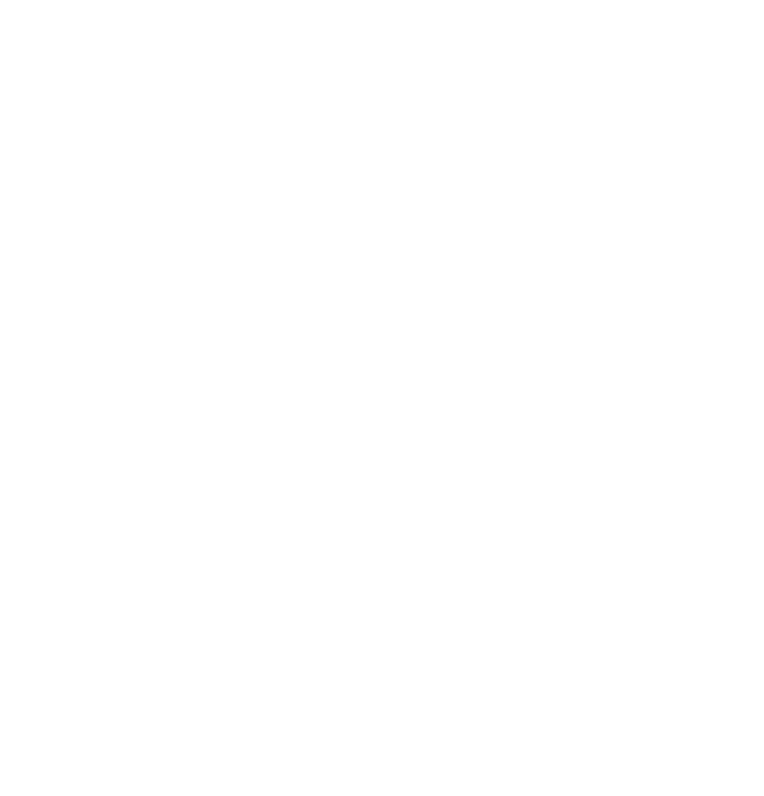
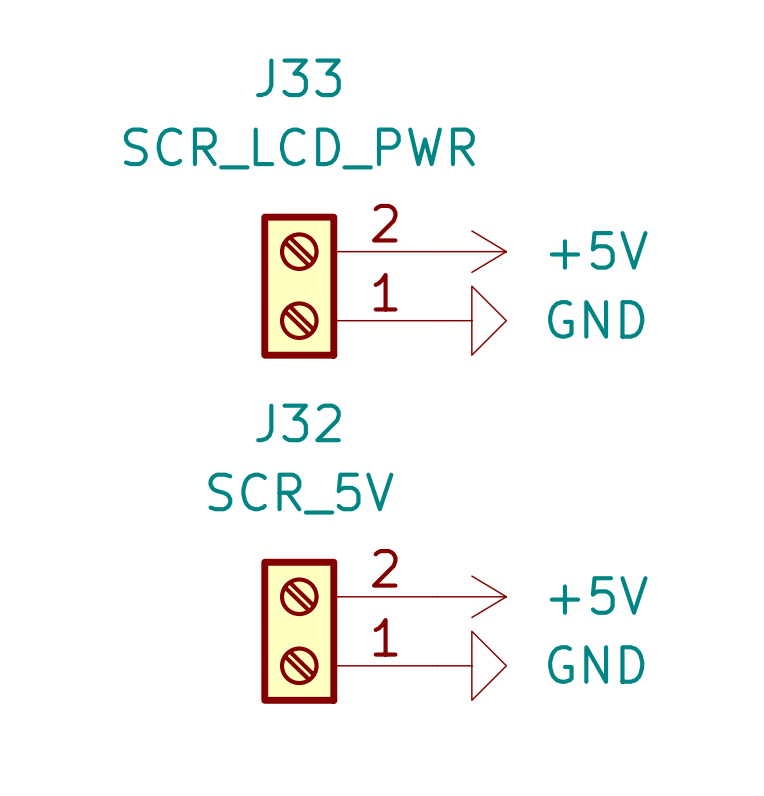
power symbol: none -> +5V (471, 251)
J33: none -> SCR_LCD_PWR (349, 286)
power symbol: none -> GND (471, 320)
power symbol: none -> +5V (471, 596)
J32: none -> SCR_5V (349, 631)
power symbol: none -> GND (471, 665)

